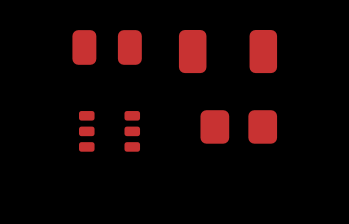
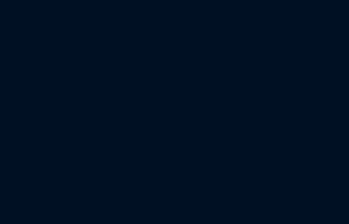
part: (107, 47) -> none
part: (228, 51) -> none
part: (238, 126) -> none
part: (109, 131) -> none

